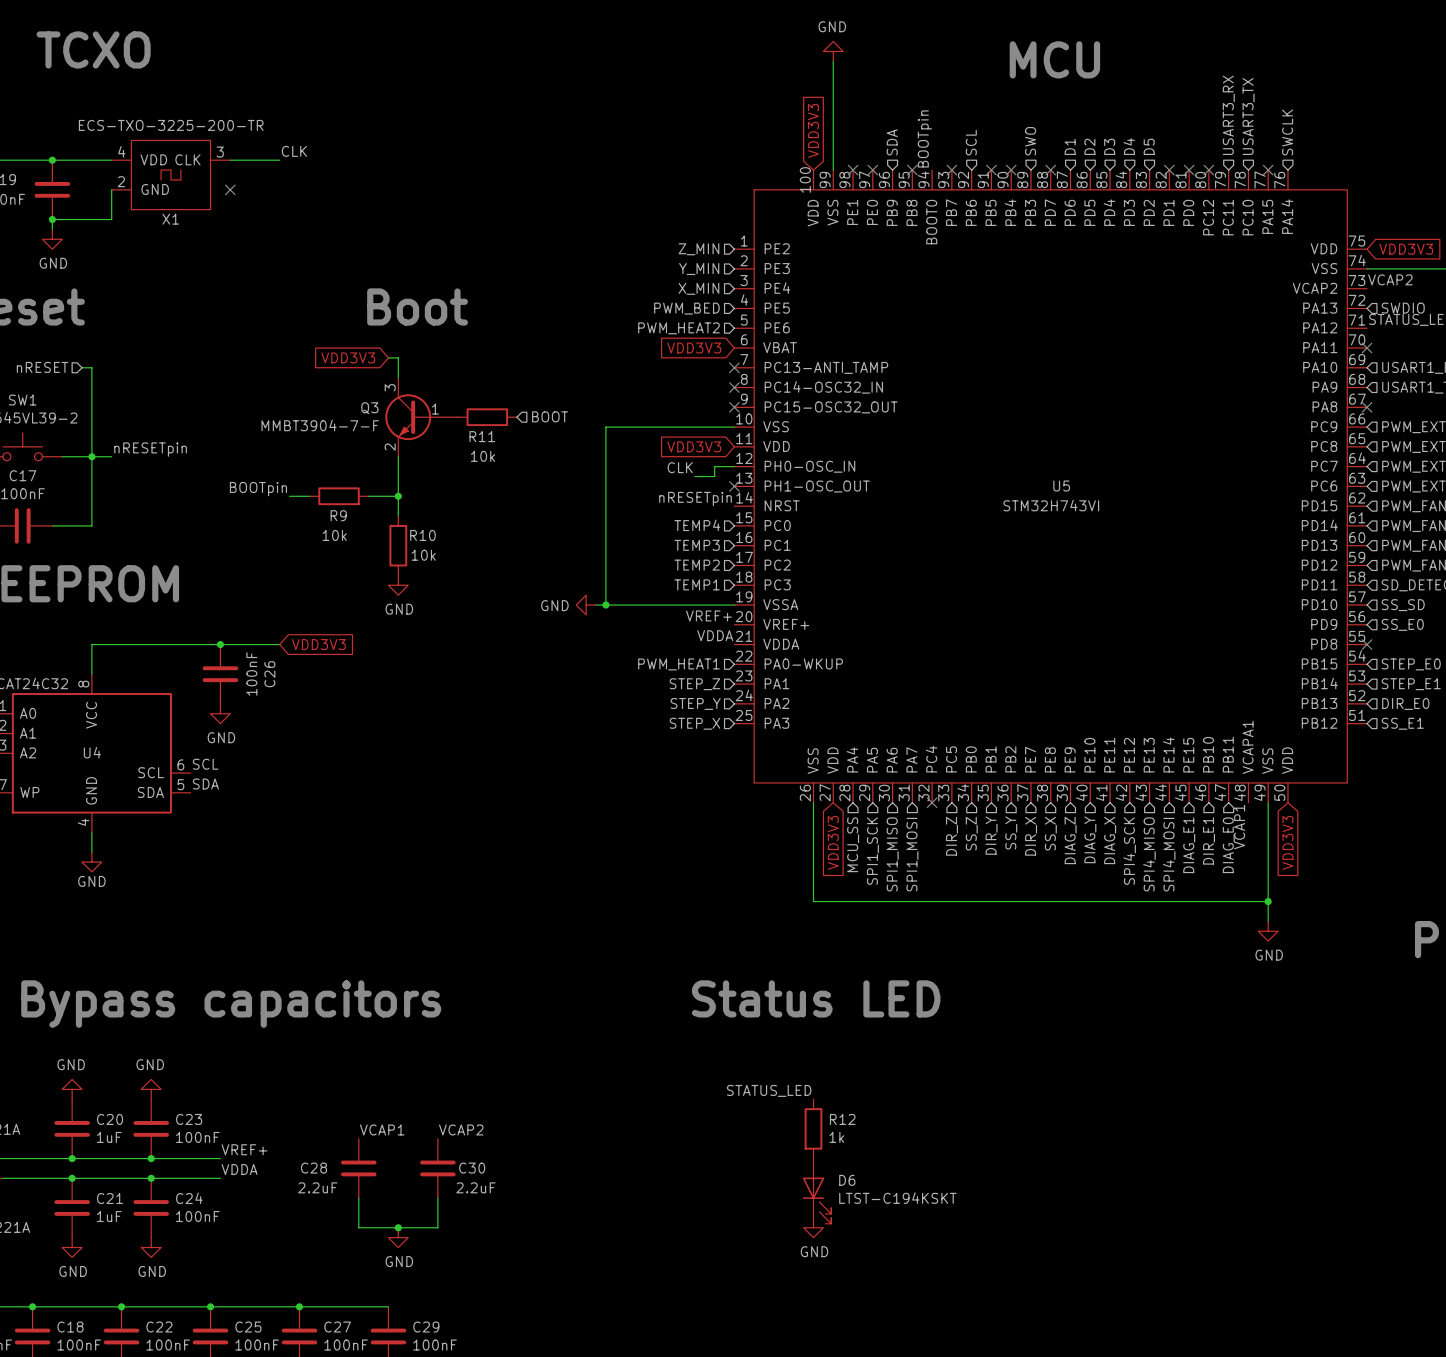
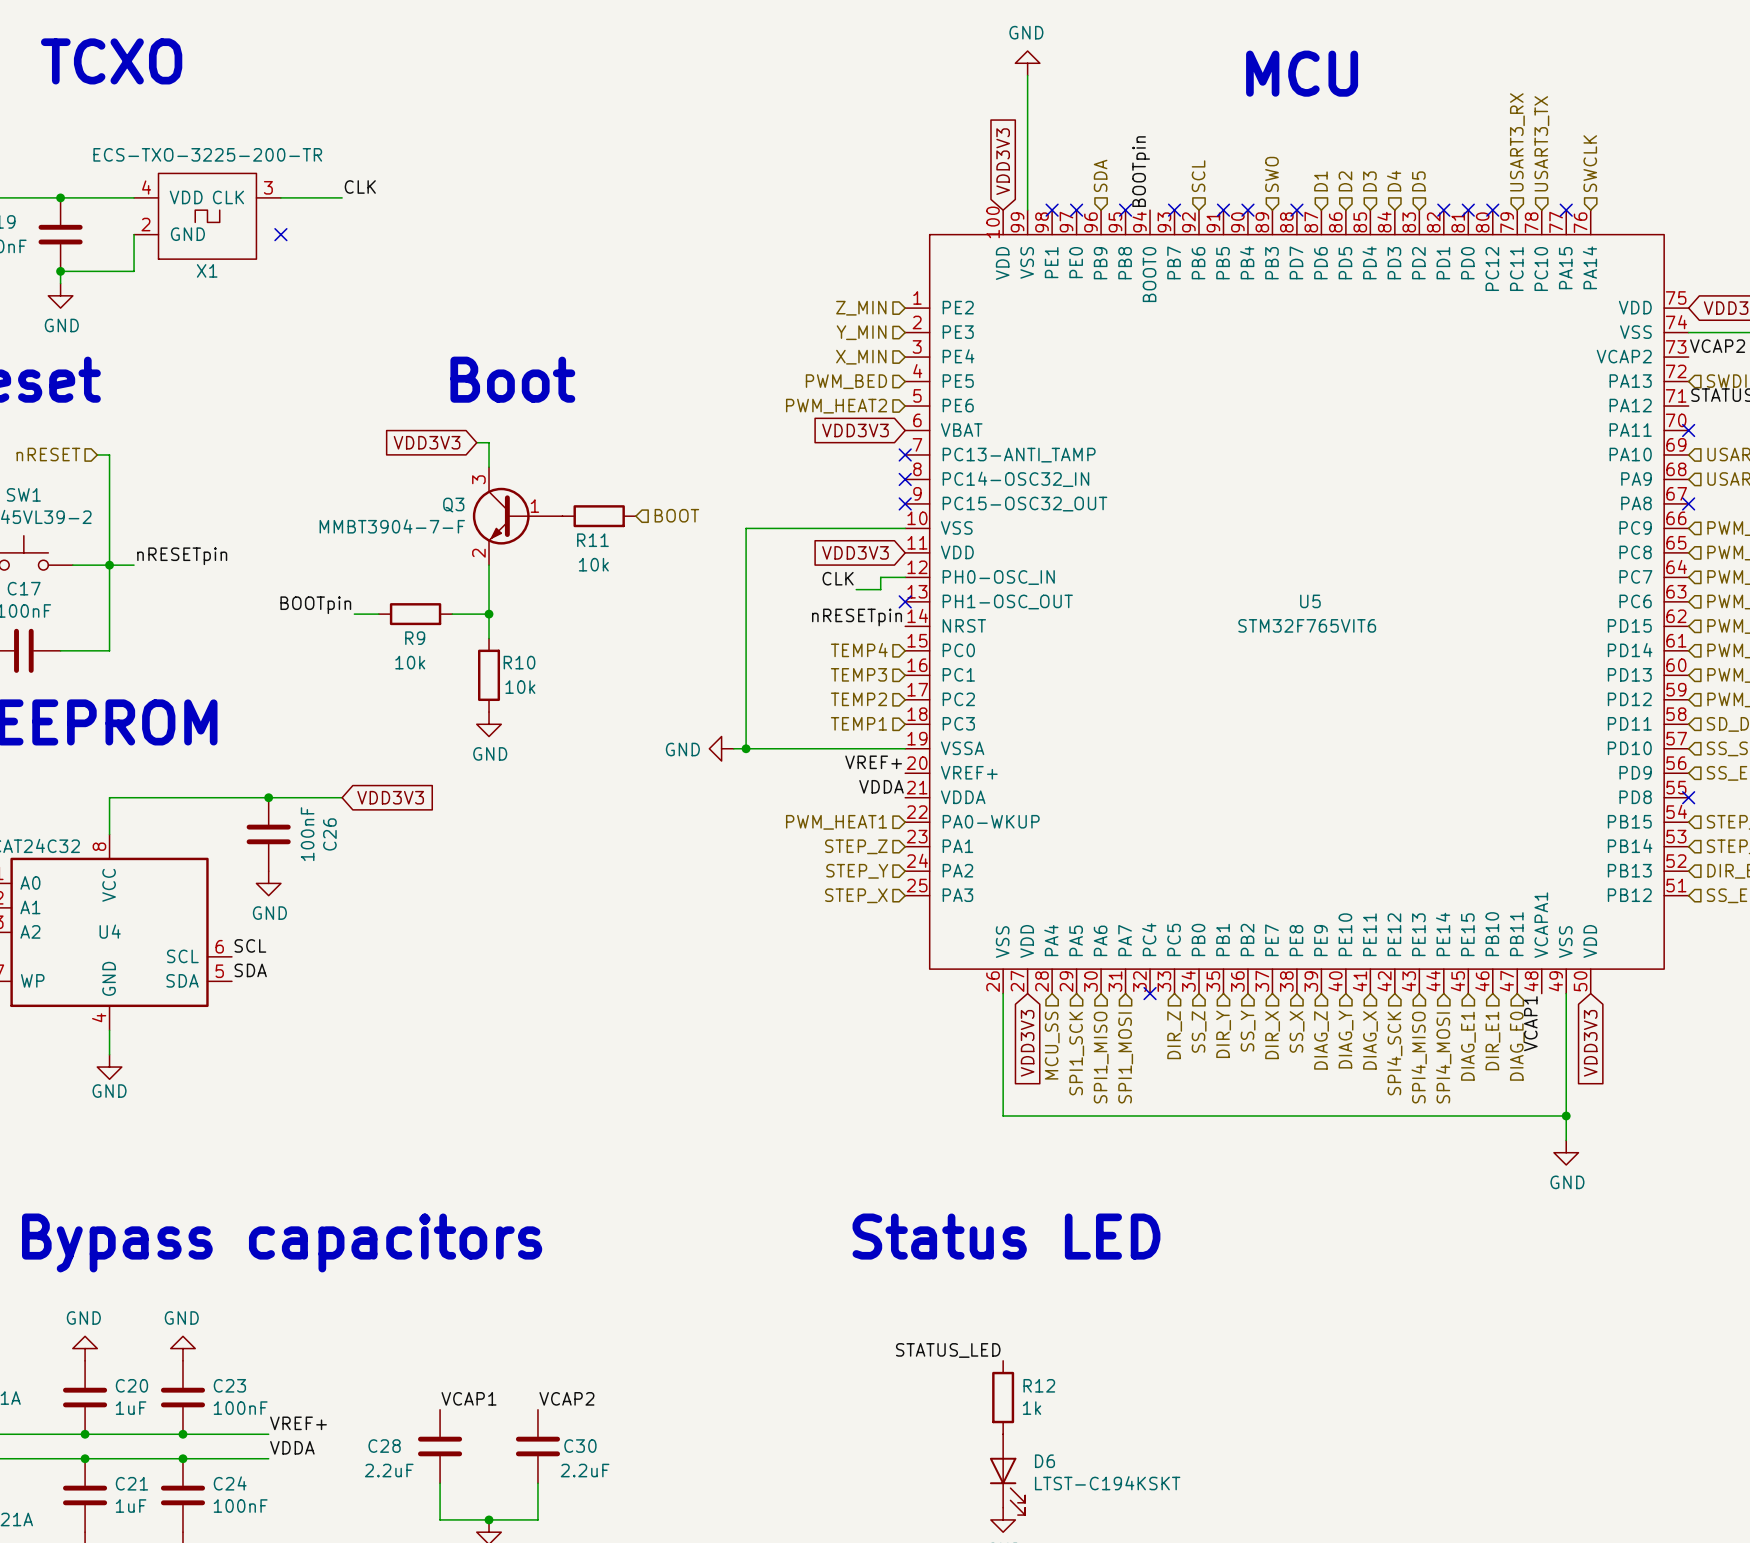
U5 value: STM32H743VI (1051, 505) -> STM32F765VIT6 (1307, 625)

